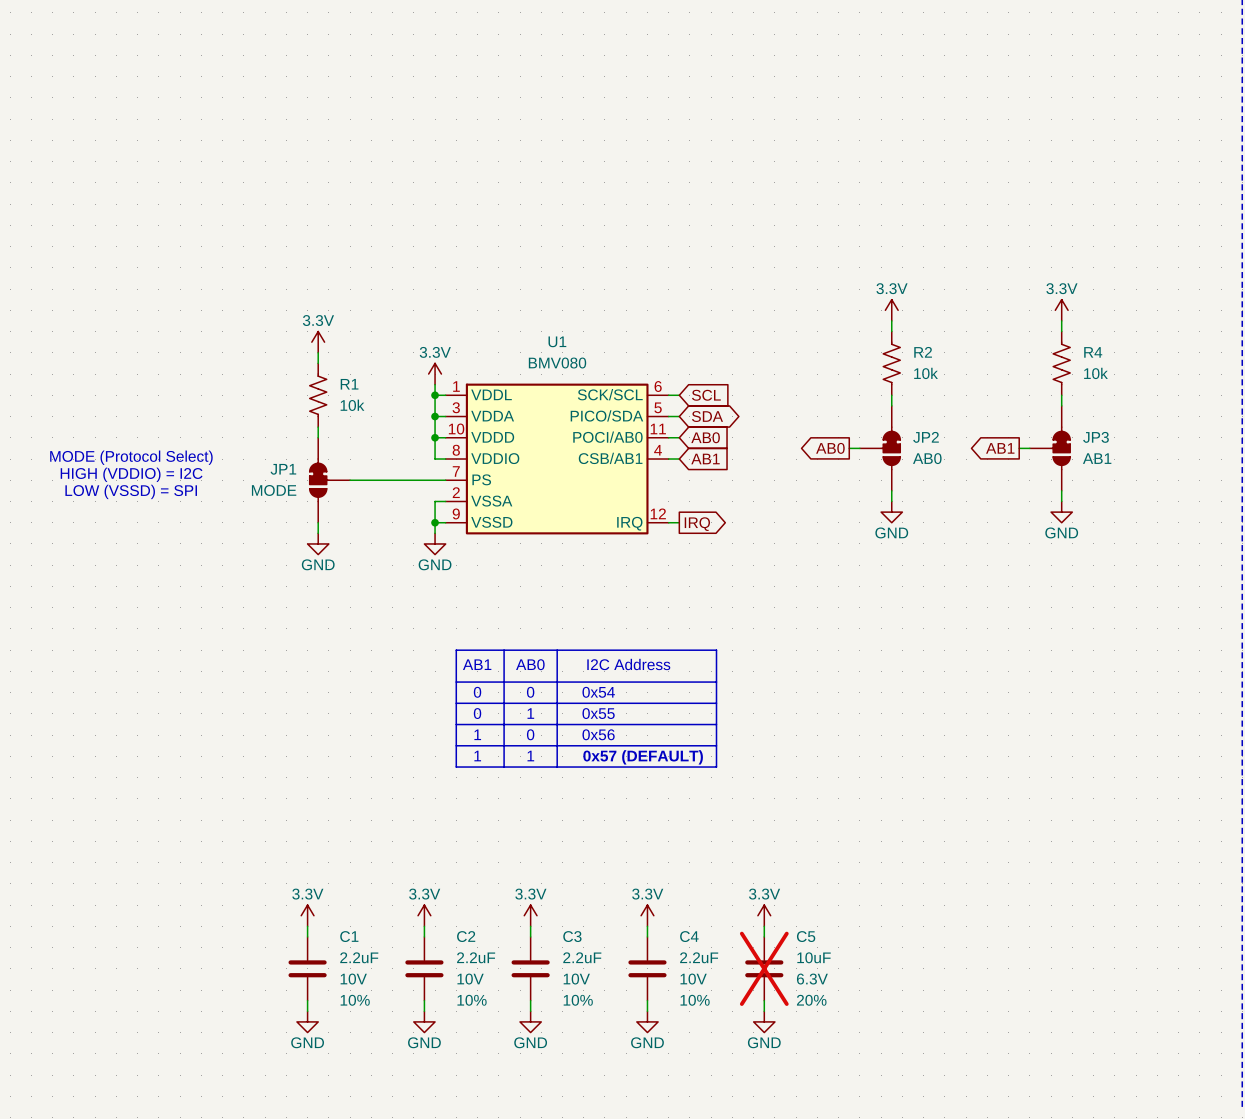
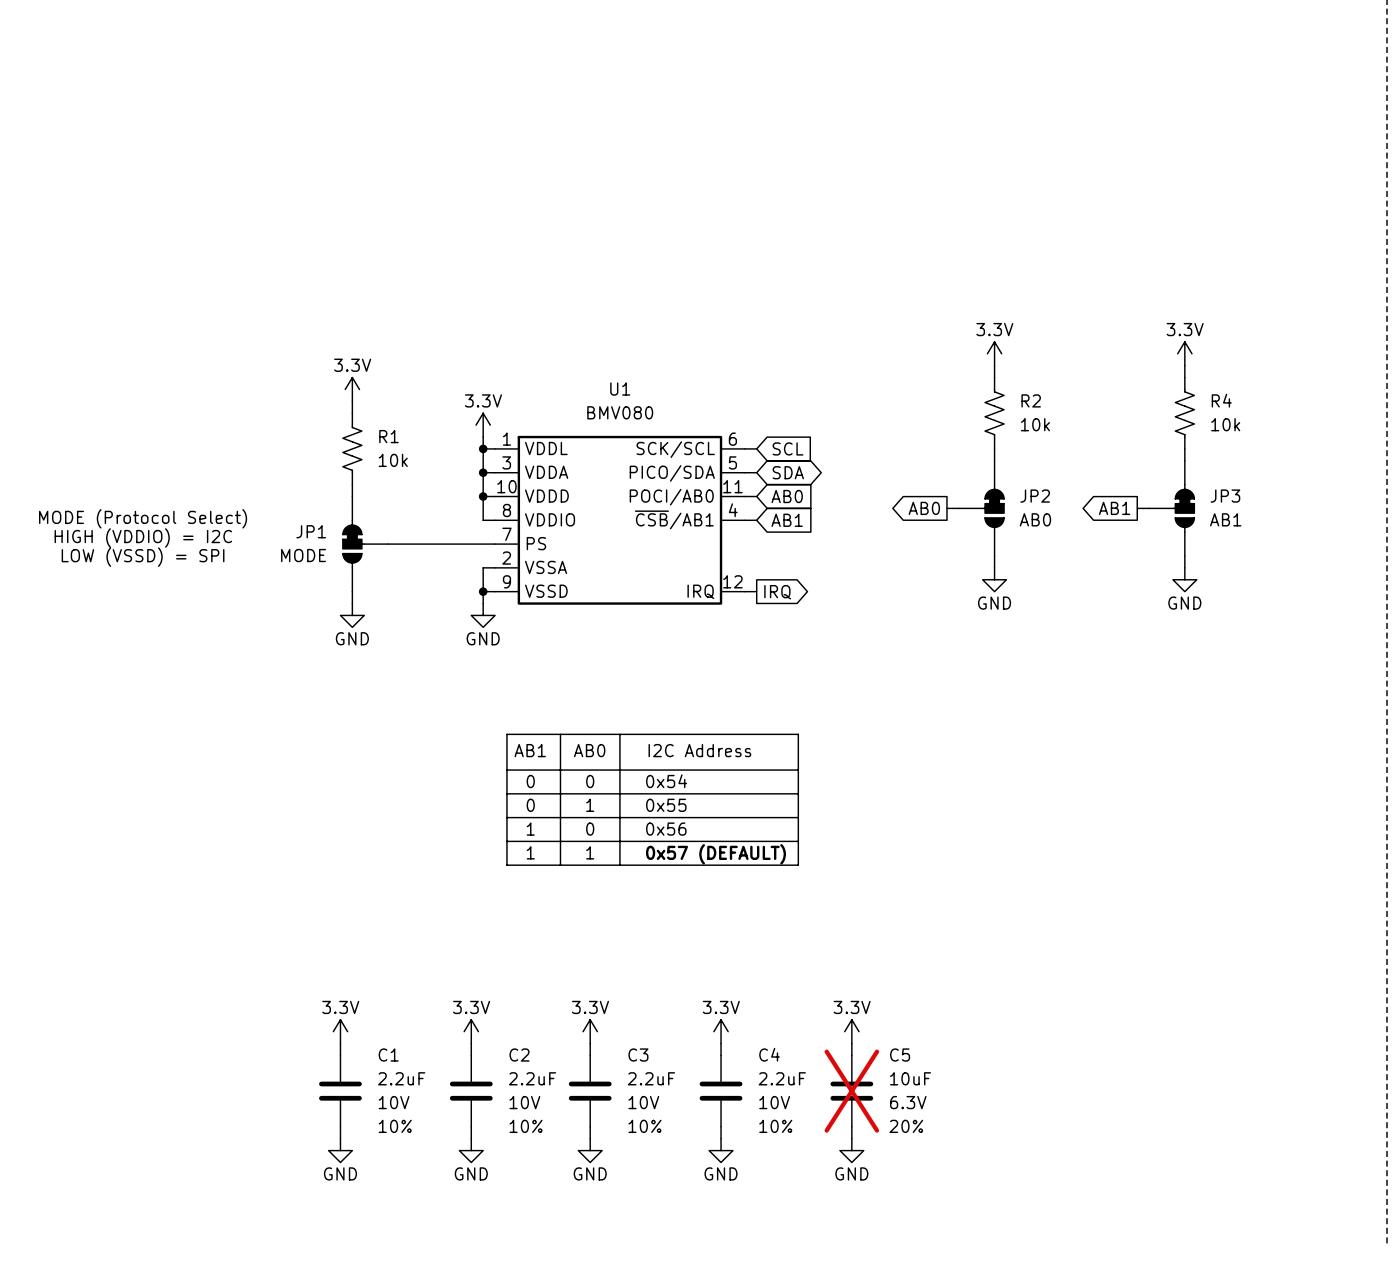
U1 pin name: CSB/AB1 (610, 458) -> ~{CSB}/AB1 (674, 519)

